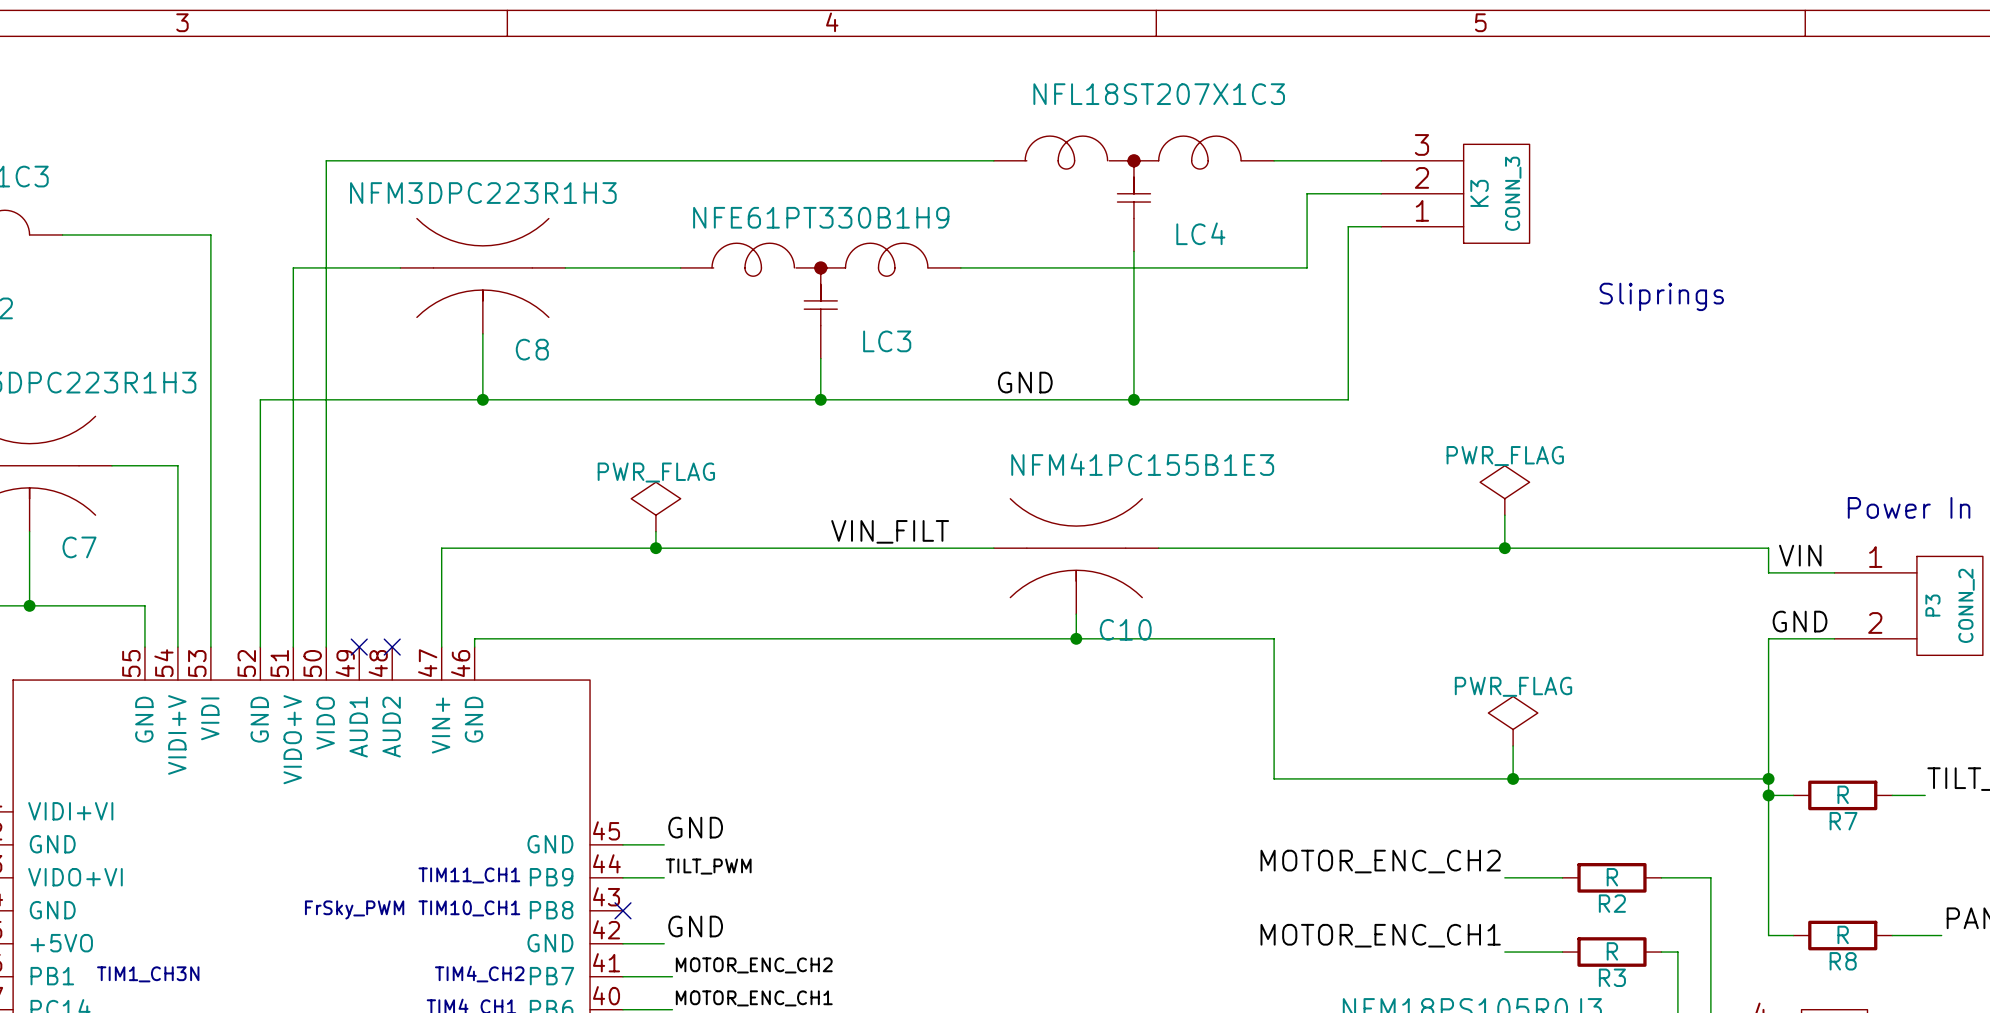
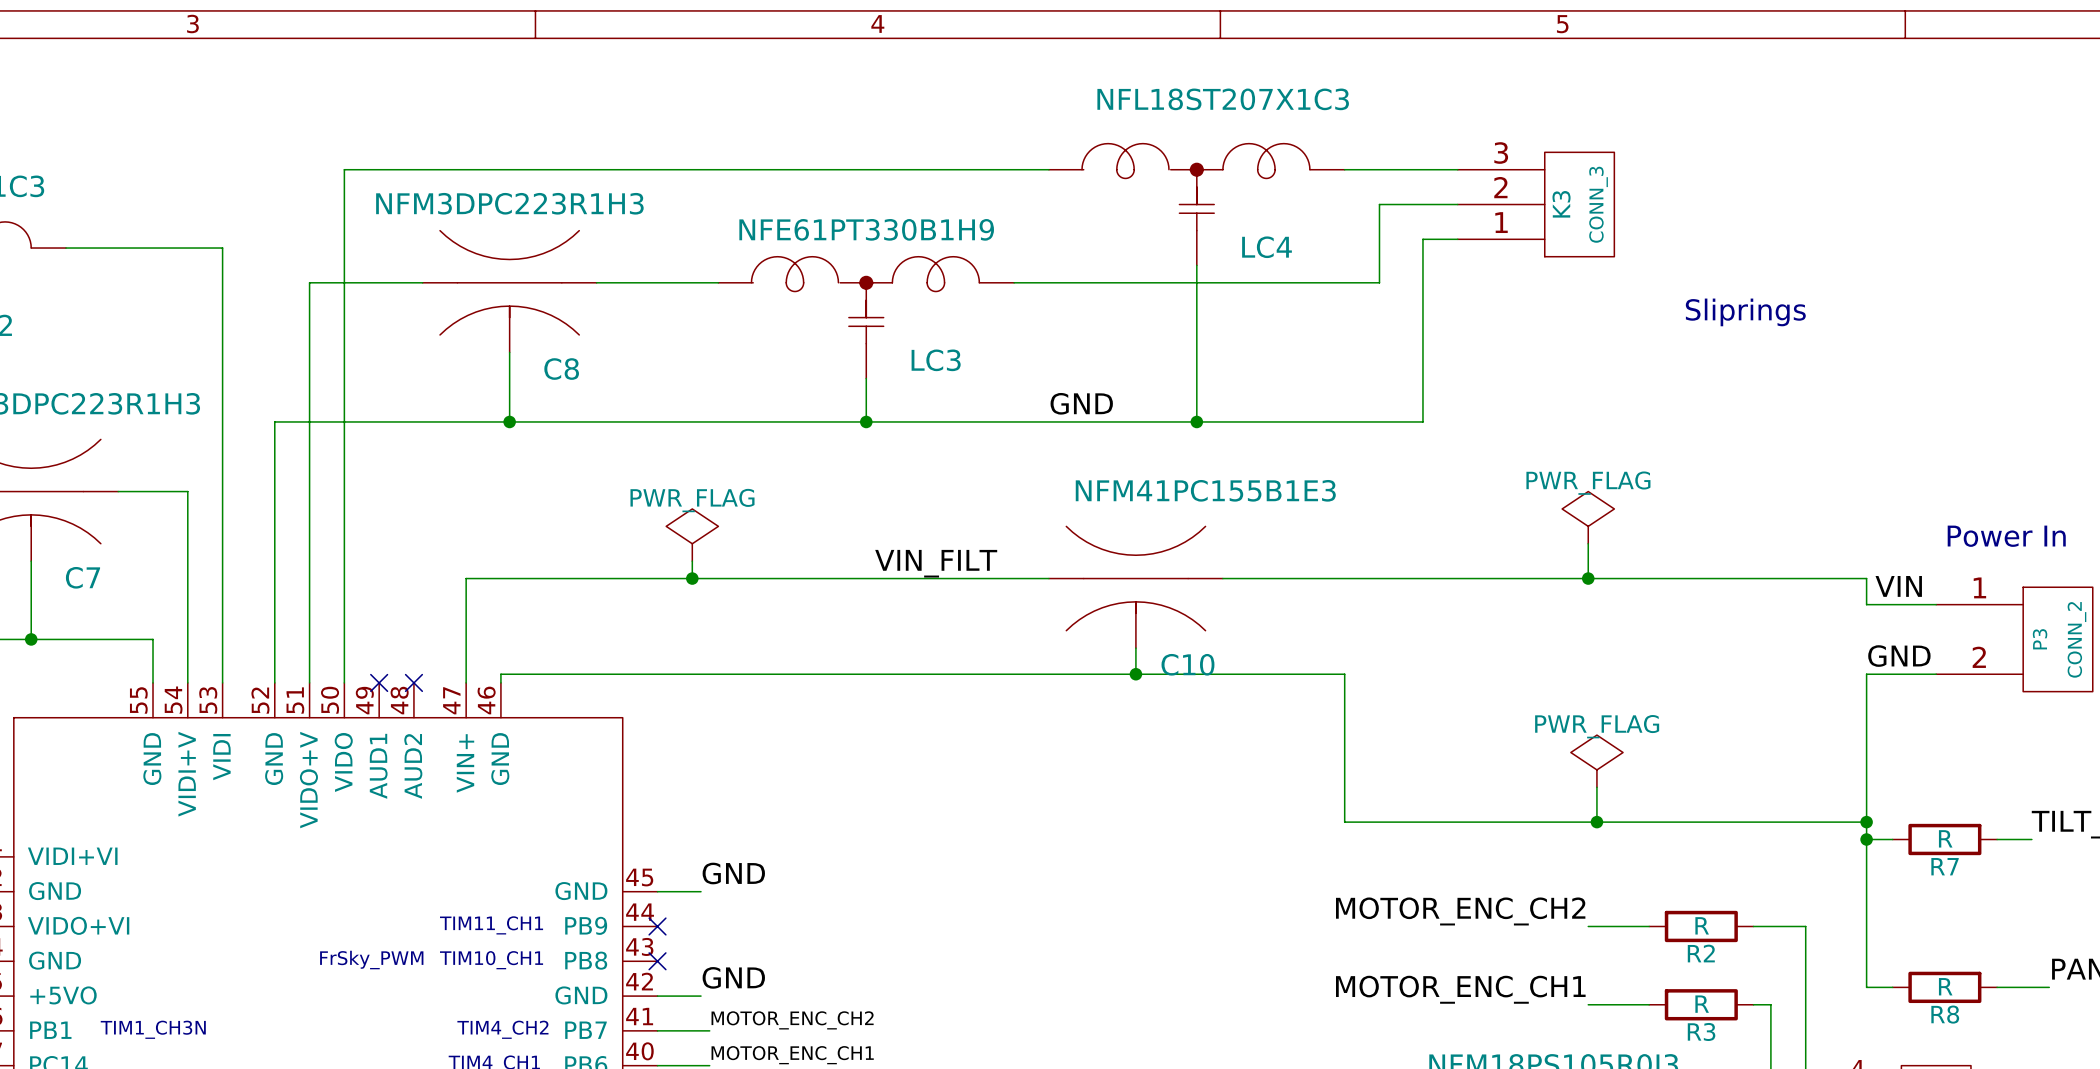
label: TILT_PWM (708, 866) -> none
wire: (622, 877) (664, 877) -> none
no-connect mark: none -> (657, 926)

